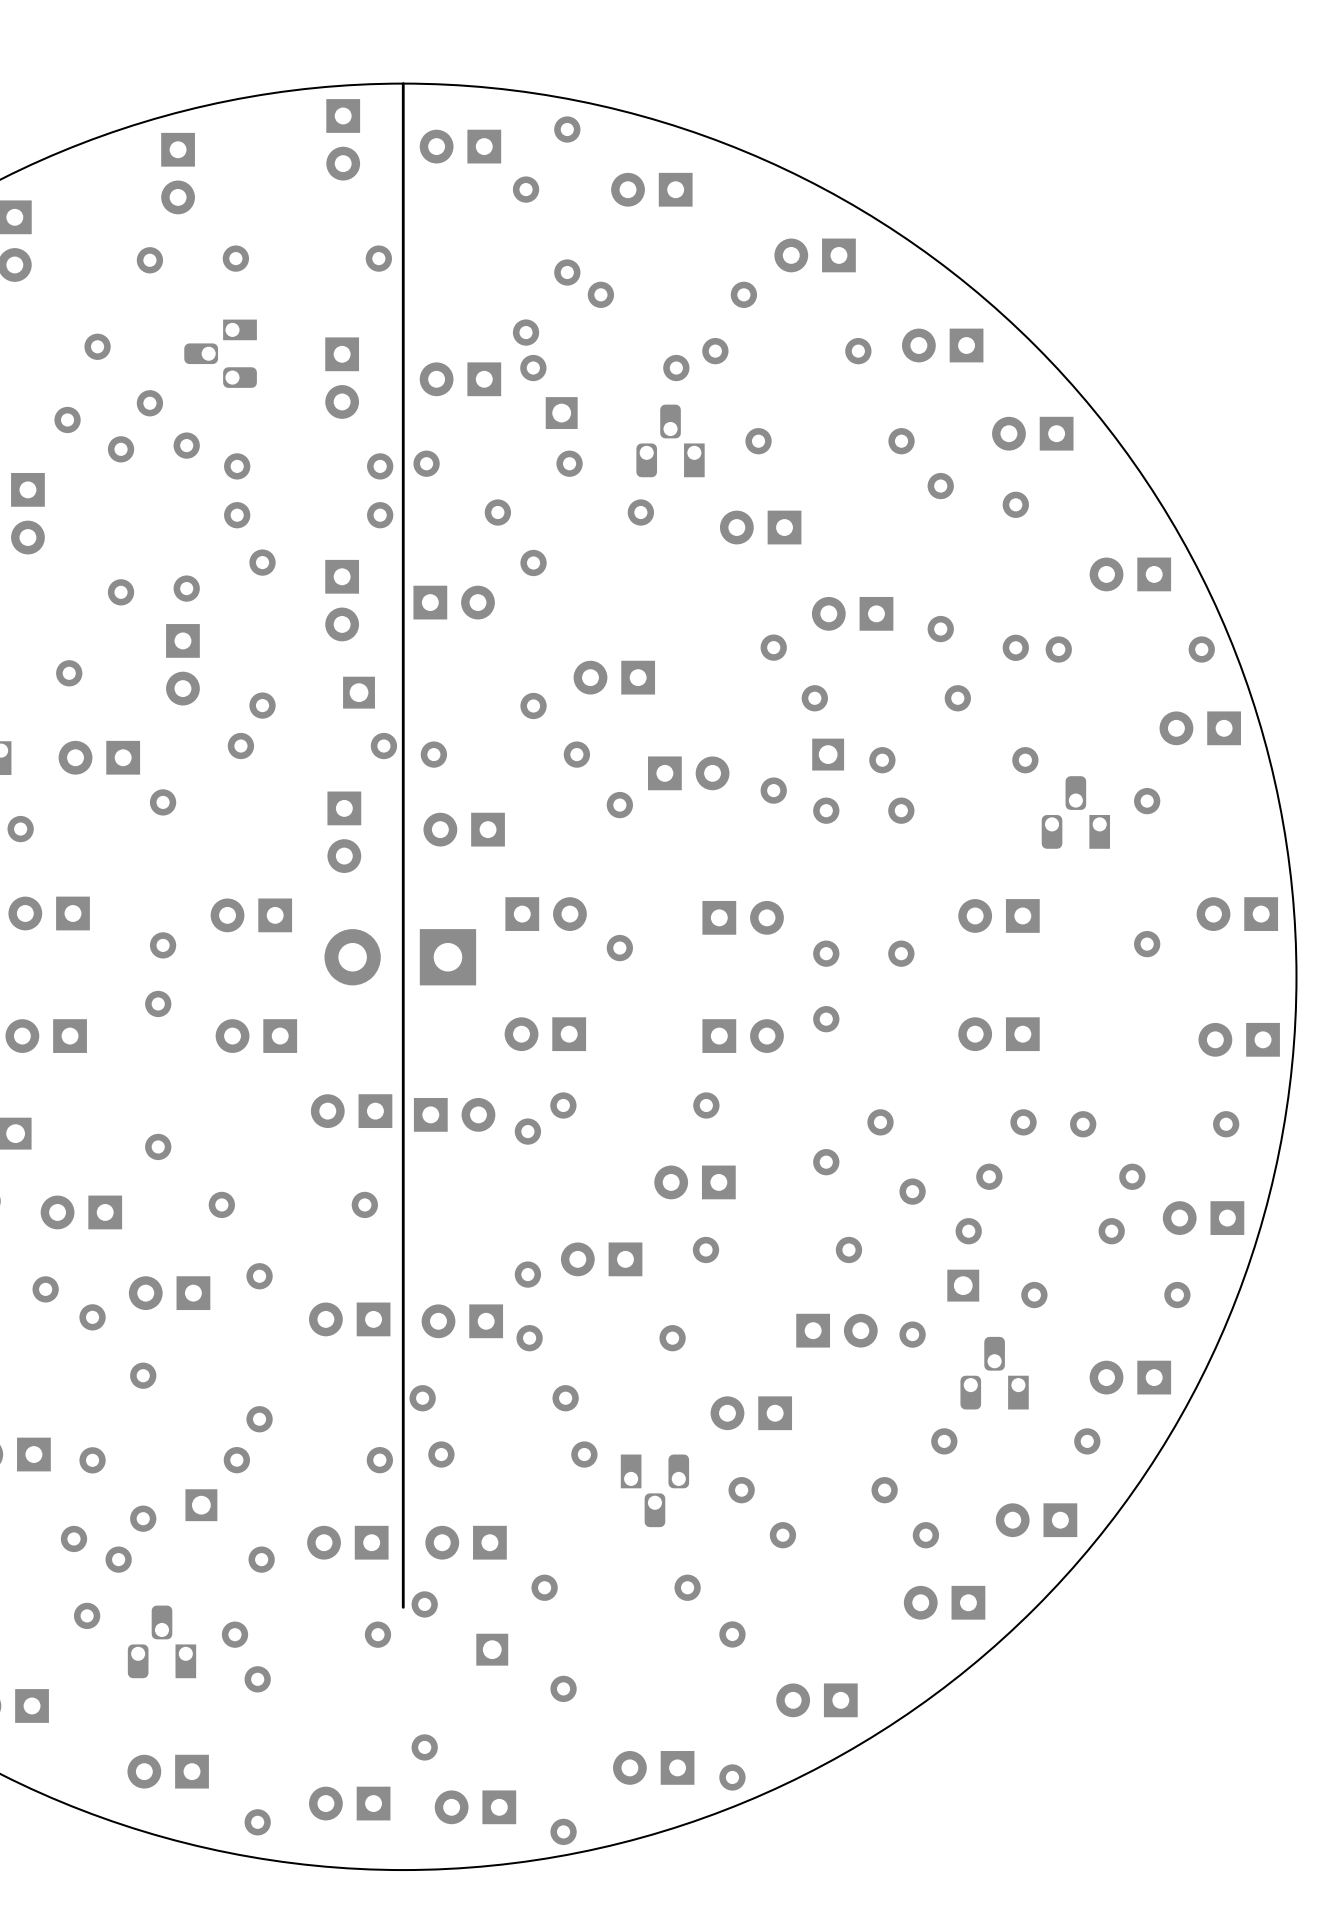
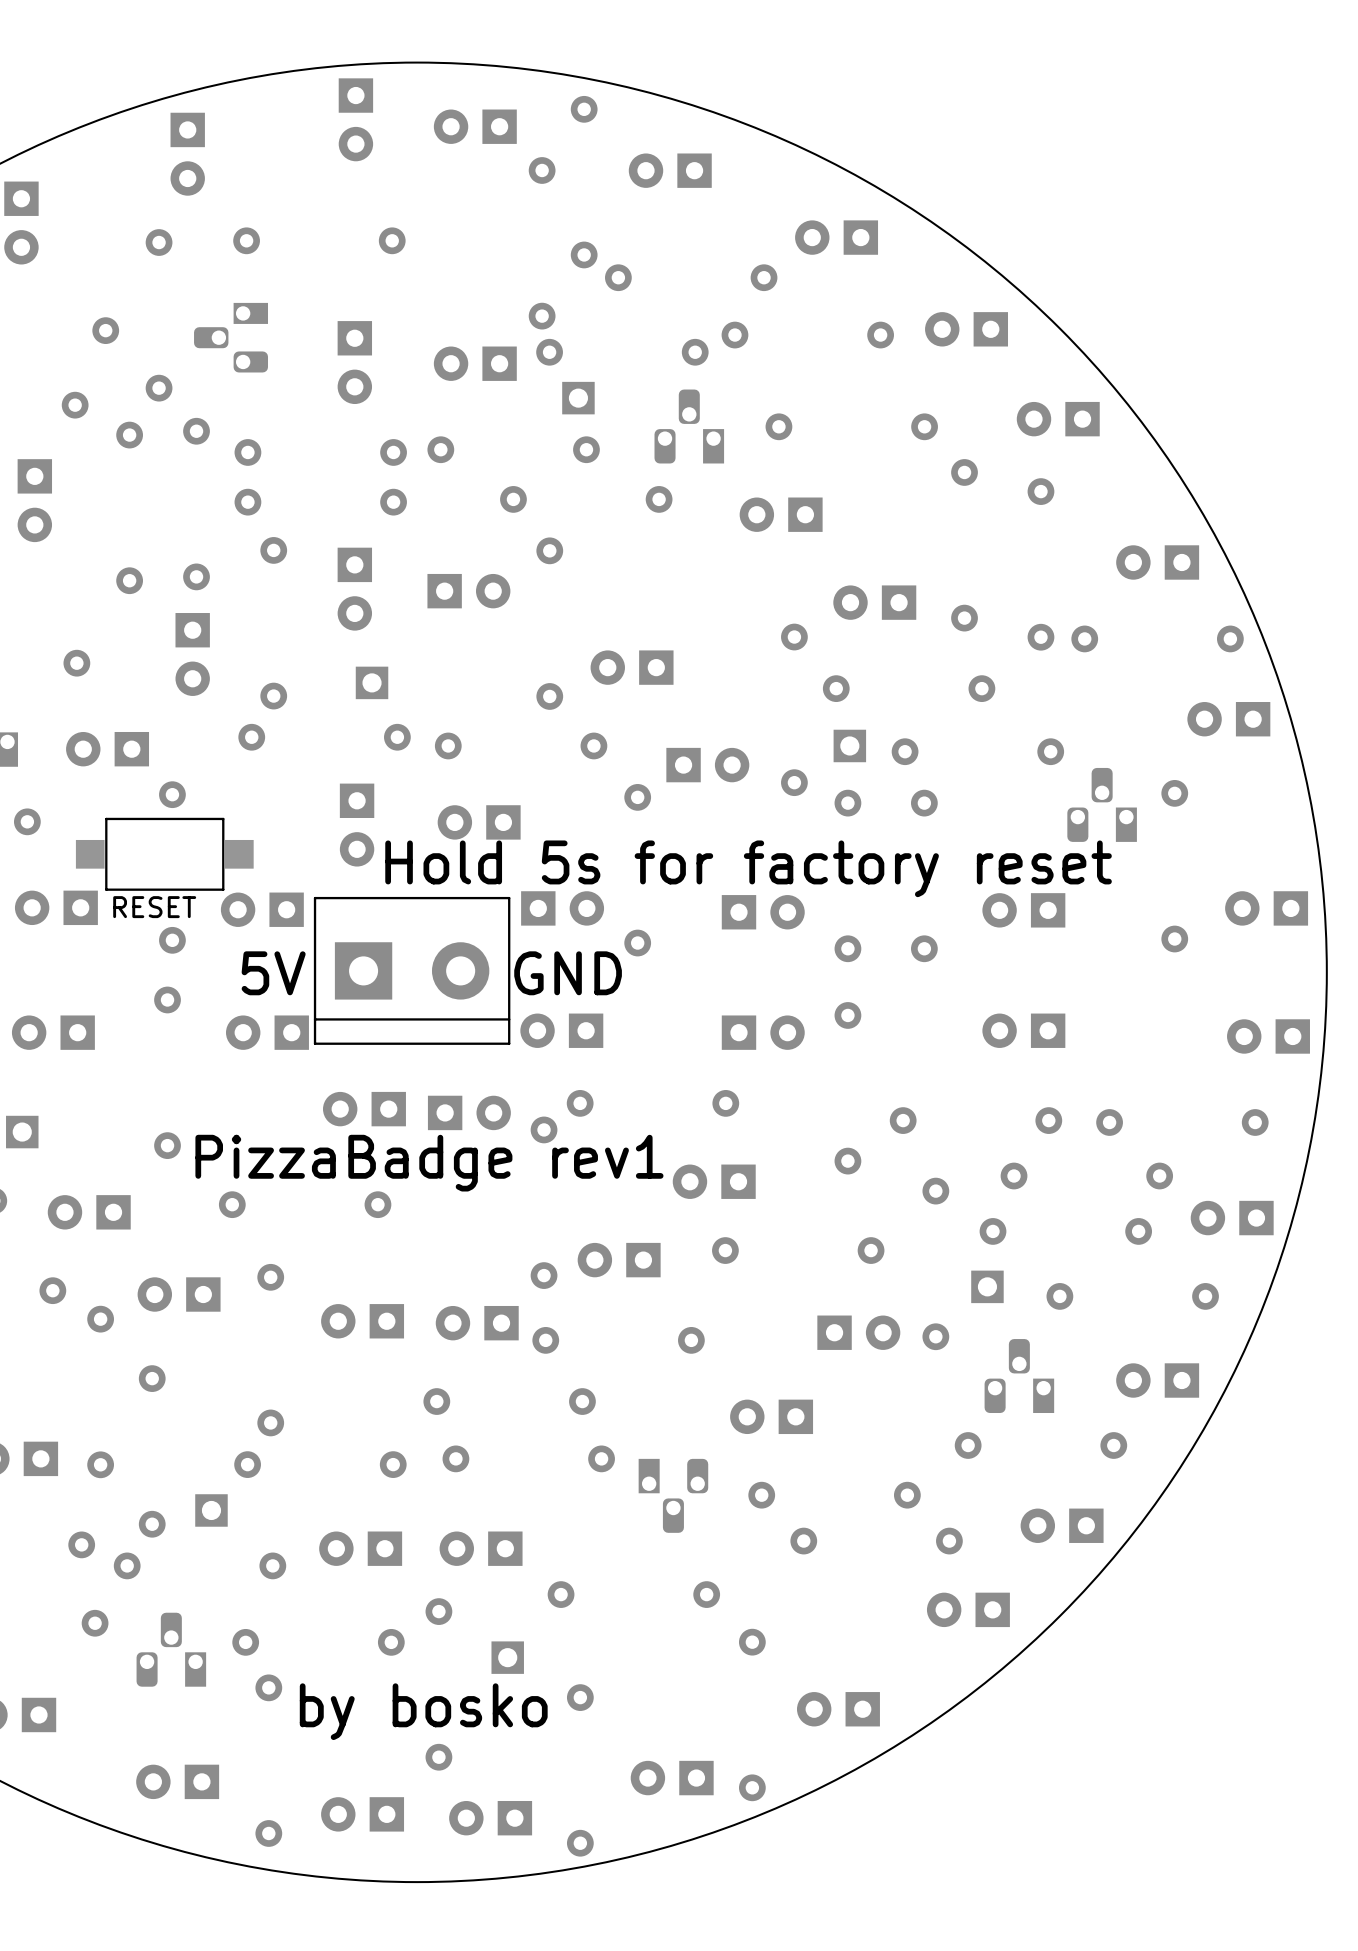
line: (403, 83) (403, 1607) -> none
part: none -> RESET (164, 854)
text: none -> Hold 5s for factory reset (748, 868)
part side: top (400, 957) -> bottom (412, 970)
text: none -> 5V (273, 973)
text: none -> GND (568, 973)
text: none -> PizzaBadge rev1 (429, 1163)
text: none -> by bosko (423, 1711)

